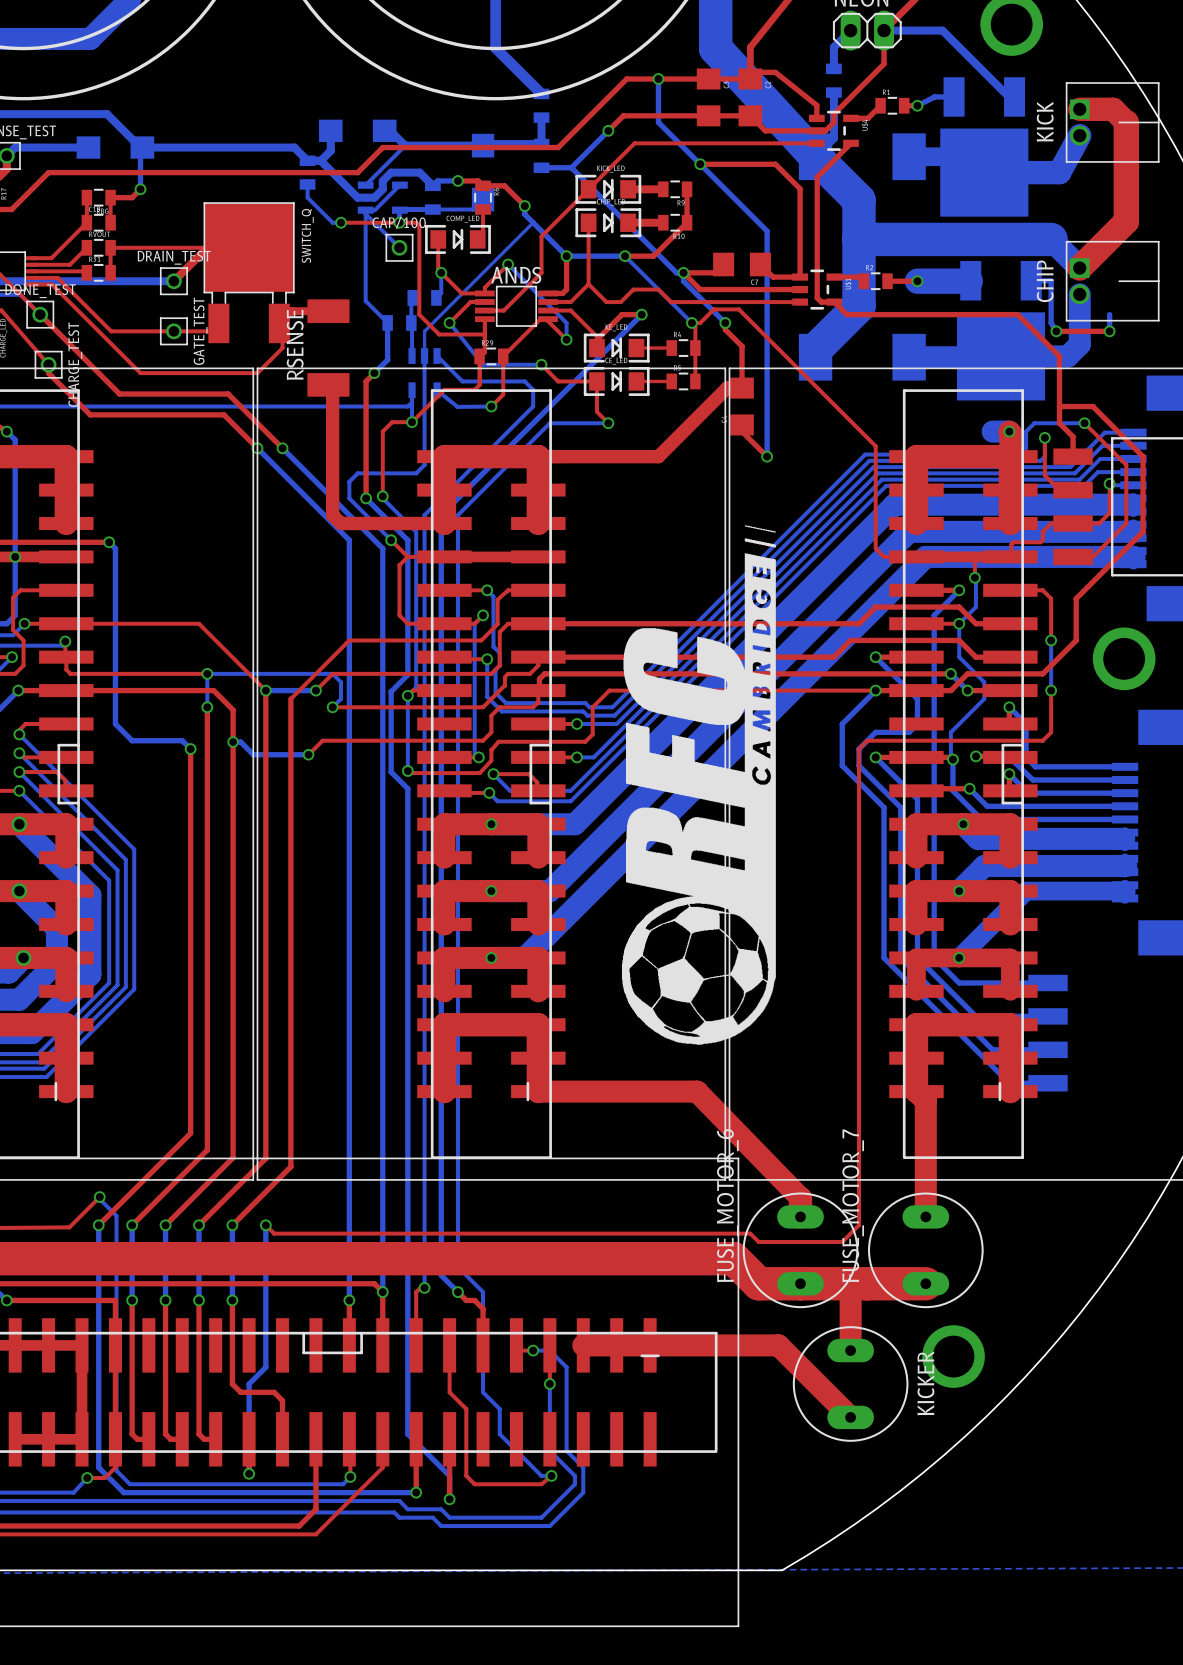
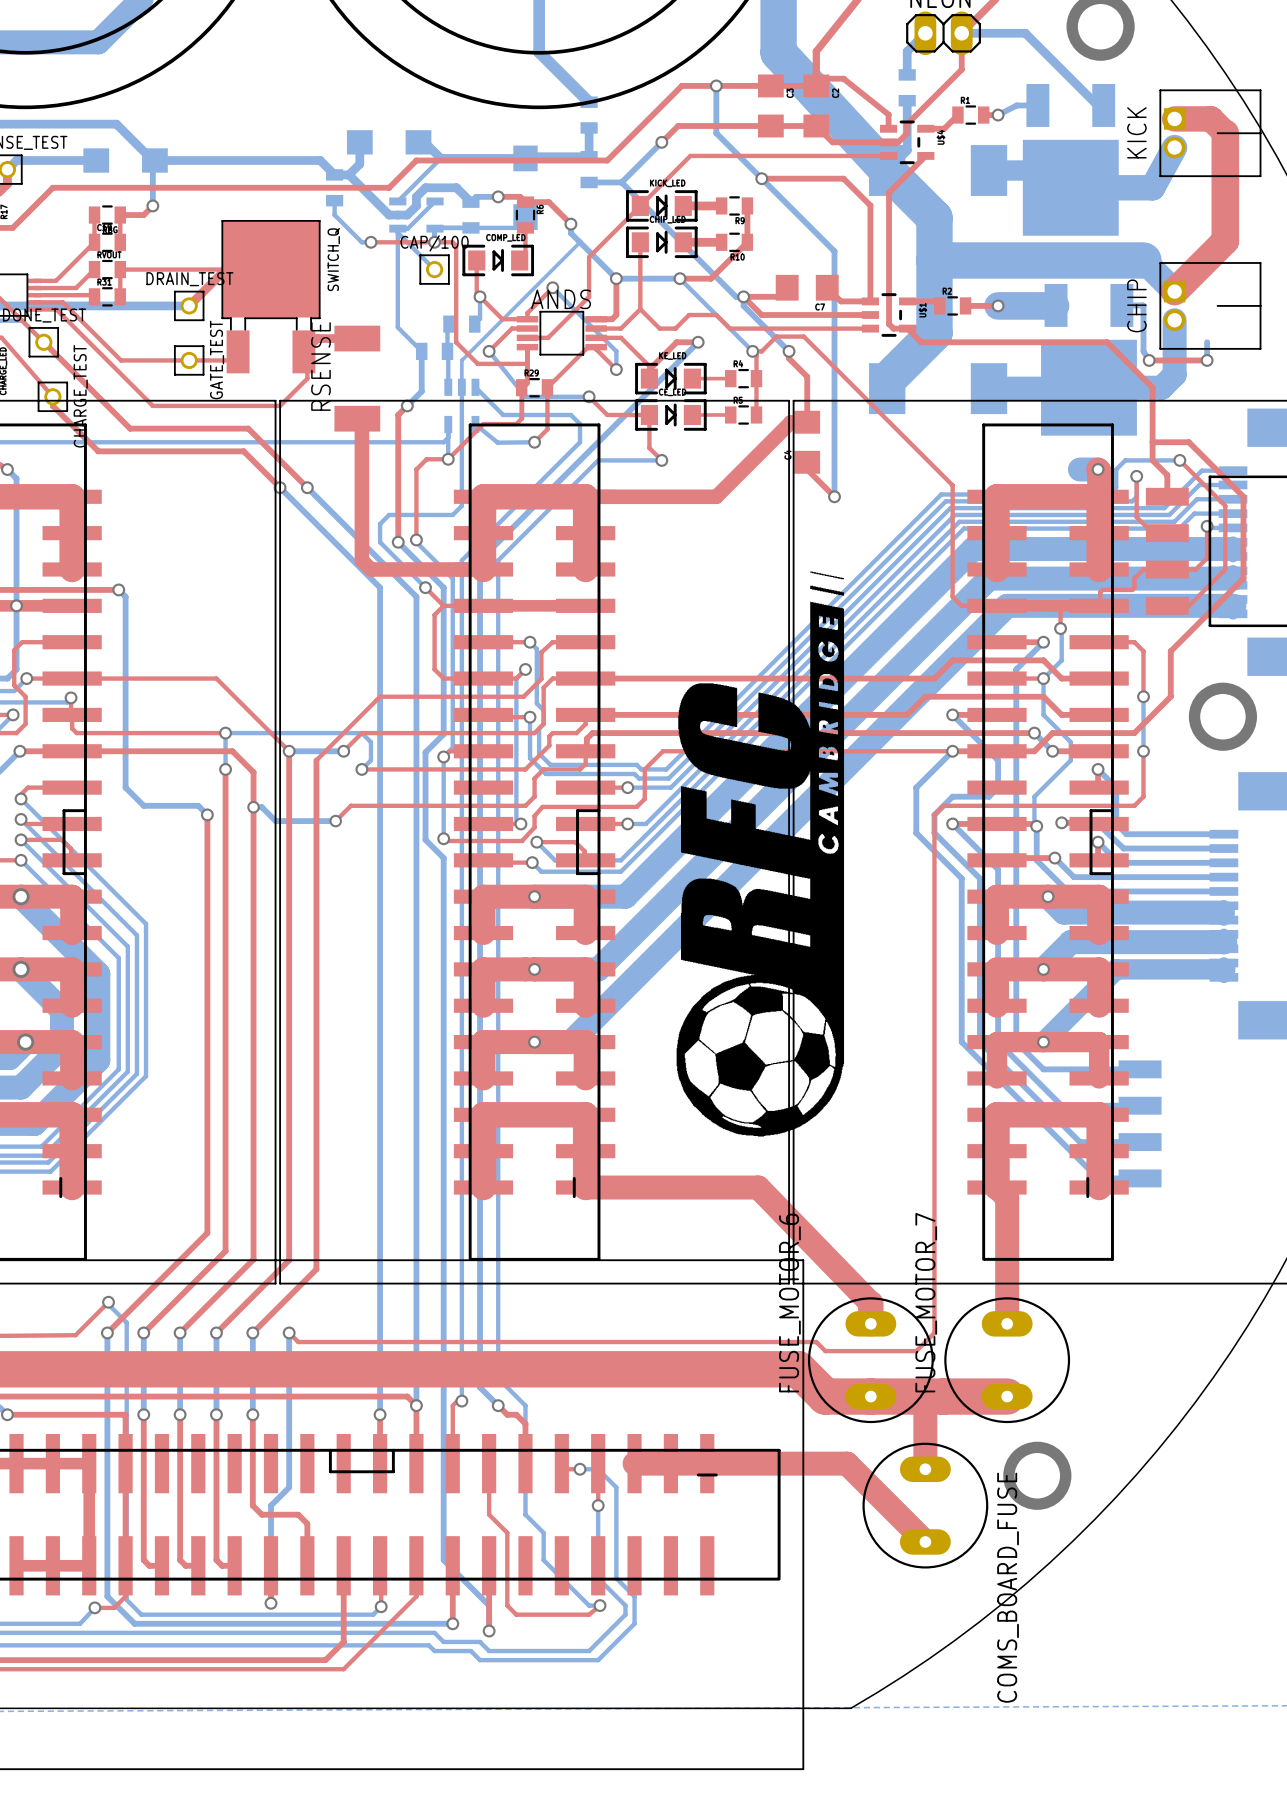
KICKER name: KICKER (925, 1383) -> COMS_BOARD_FUSE (1008, 1587)

